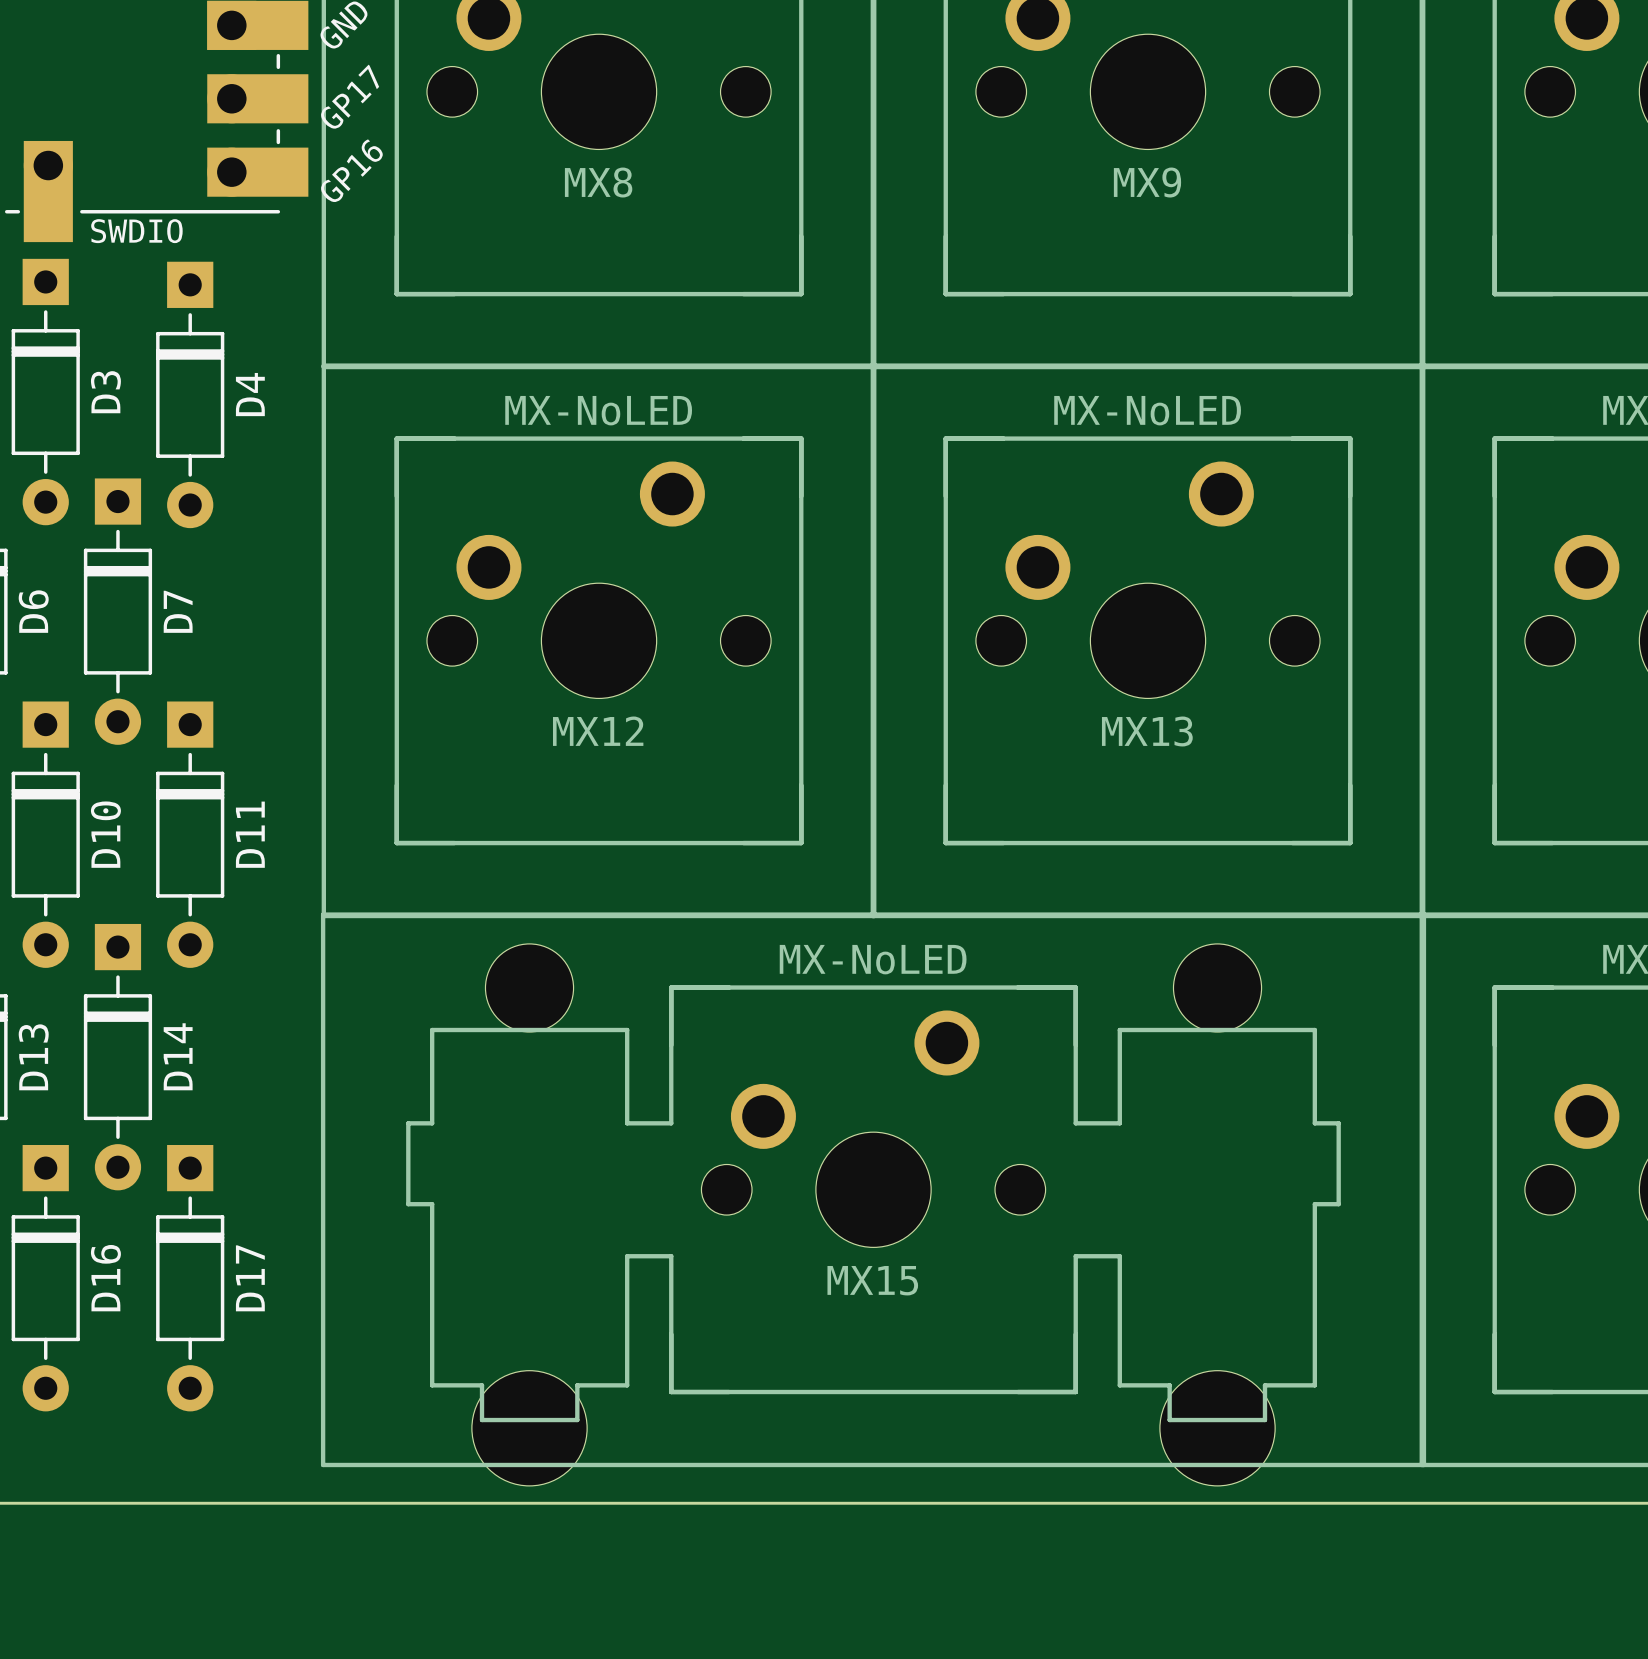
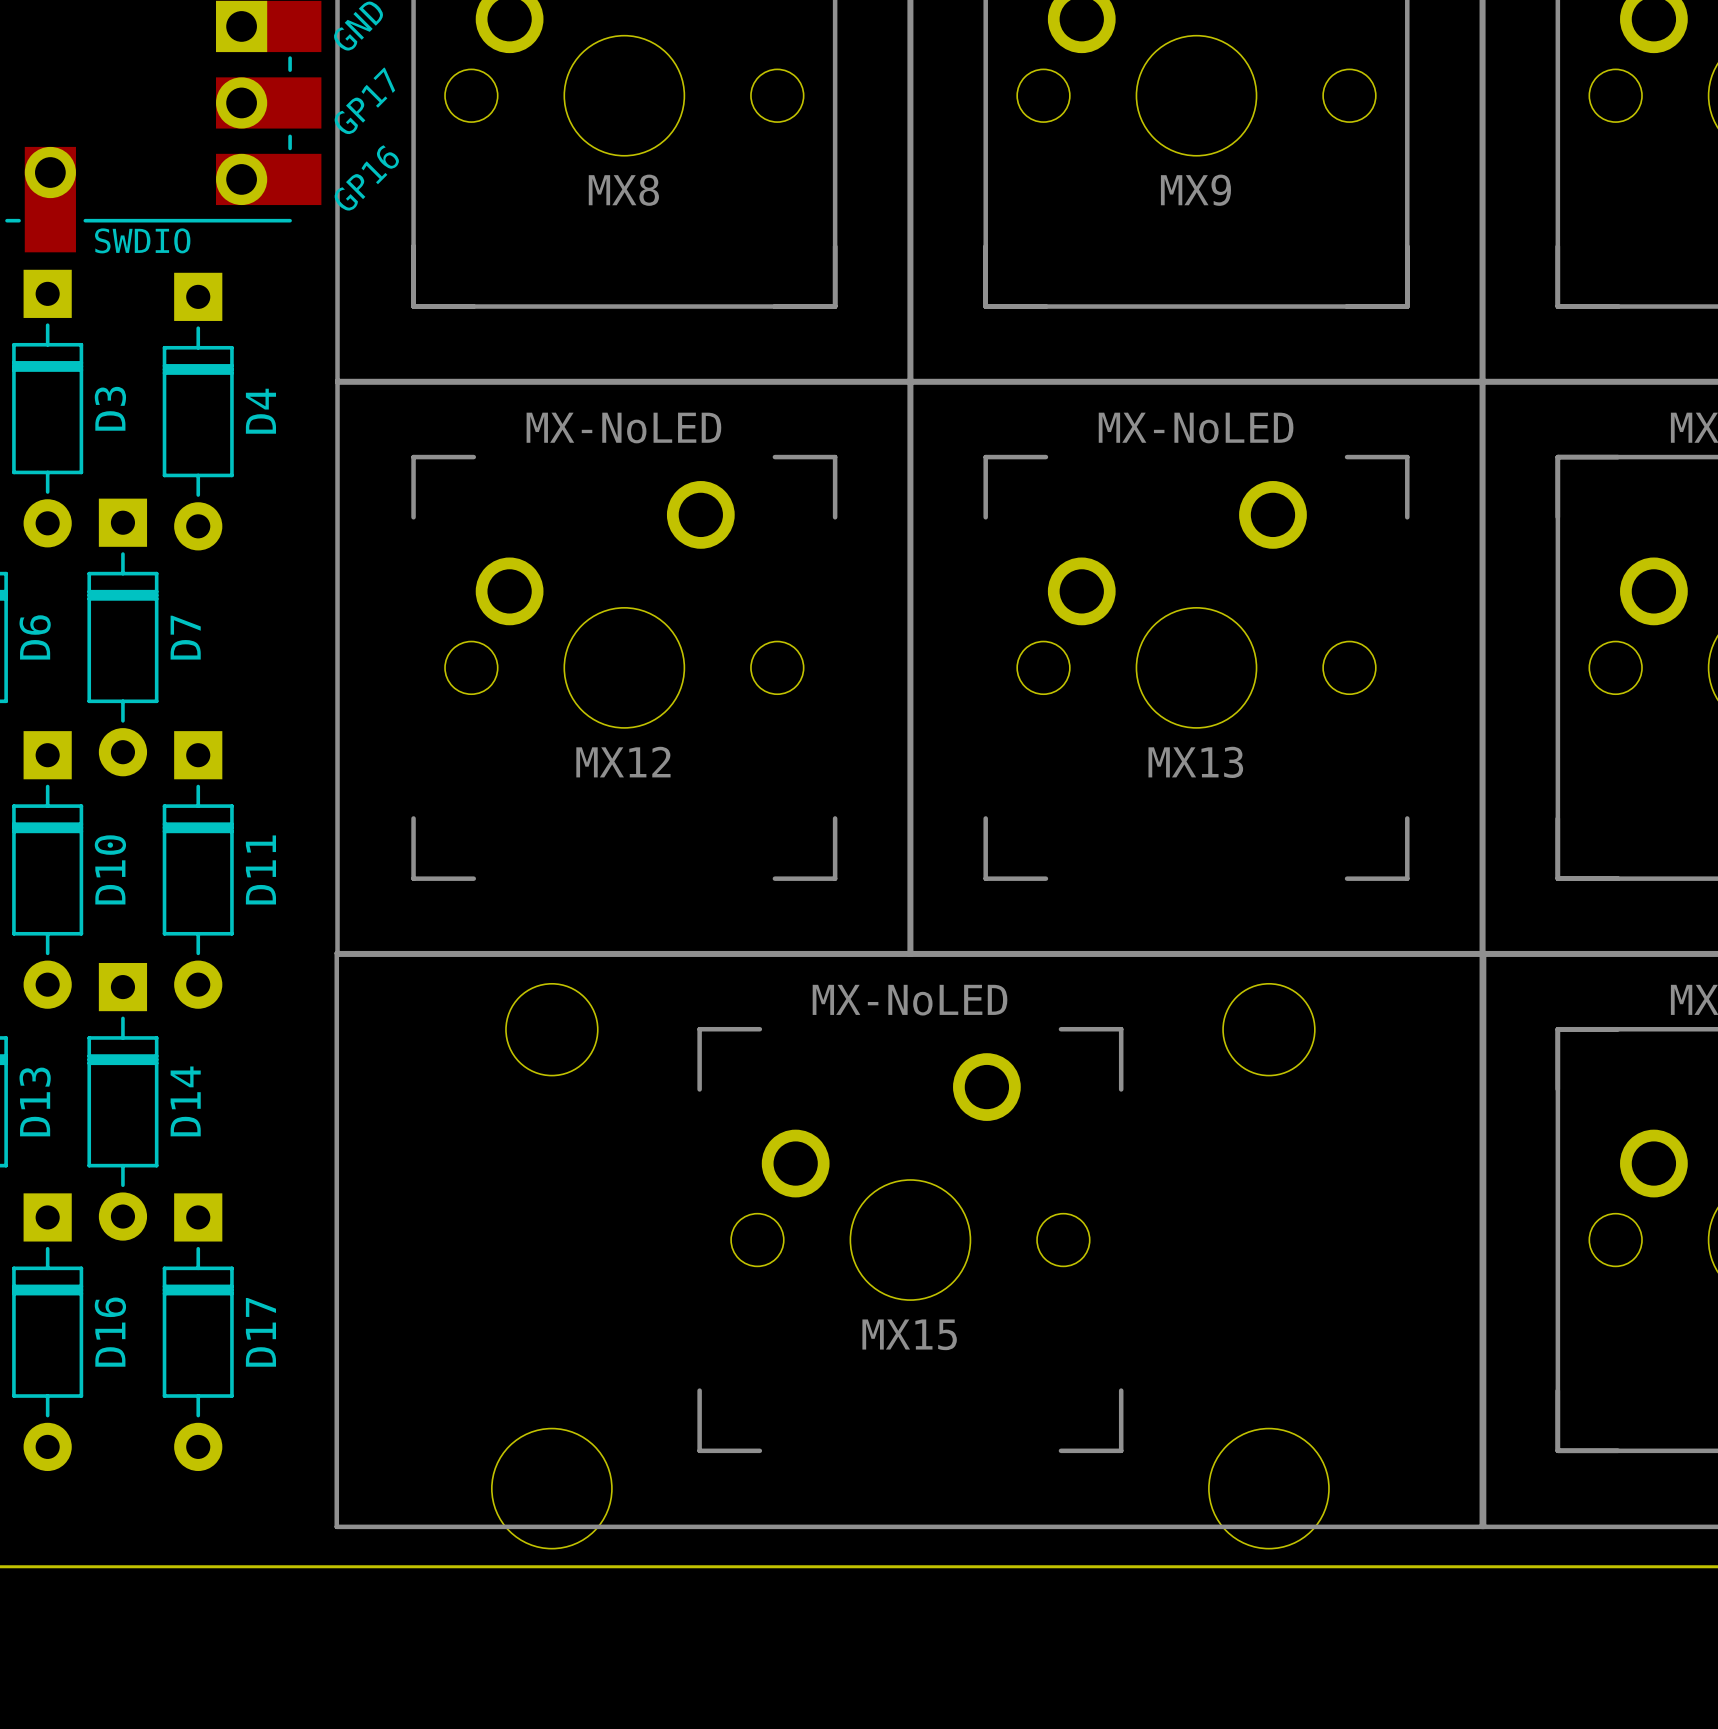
line: (396, 438) (396, 843) (801, 843) (801, 438) (396, 438) -> none
line: (945, 438) (1350, 438) (1350, 843) (945, 843) (945, 438) -> none
line: (671, 987) (1075, 987) (1075, 1123) (1119, 1123) (1119, 1030) (1314, 1030) (1314, 1123) (1338, 1123) (1338, 1204) (1314, 1204) (1314, 1385) (1264, 1385) (1264, 1420) (1169, 1420) (1169, 1385) (1119, 1385) (1119, 1256) (1075, 1256) (1075, 1392) (671, 1392) (671, 1256) (627, 1256) (627, 1385) (577, 1385) (577, 1420) (482, 1420) (482, 1385) (432, 1385) (432, 1204) (408, 1204) (408, 1123) (432, 1123) (432, 1030) (627, 1030) (627, 1123) (671, 1123) (671, 987) -> none

